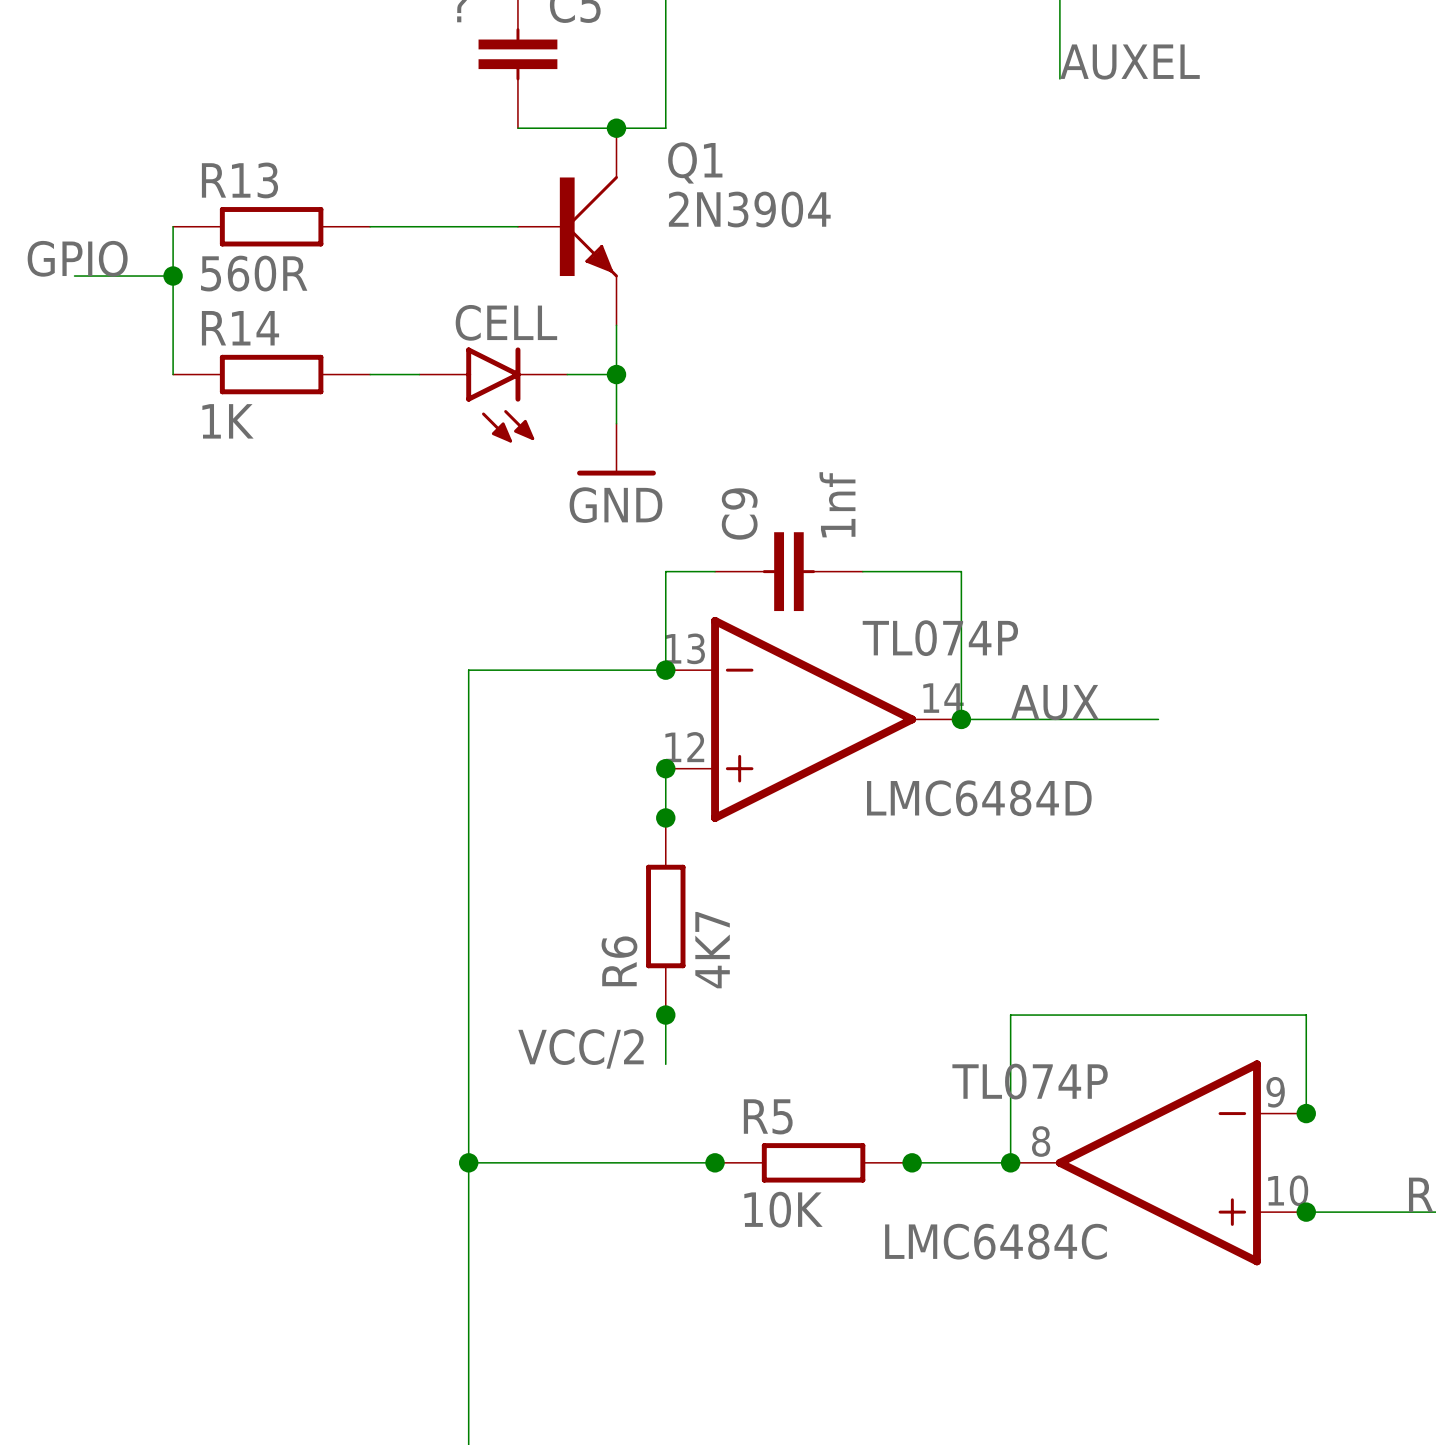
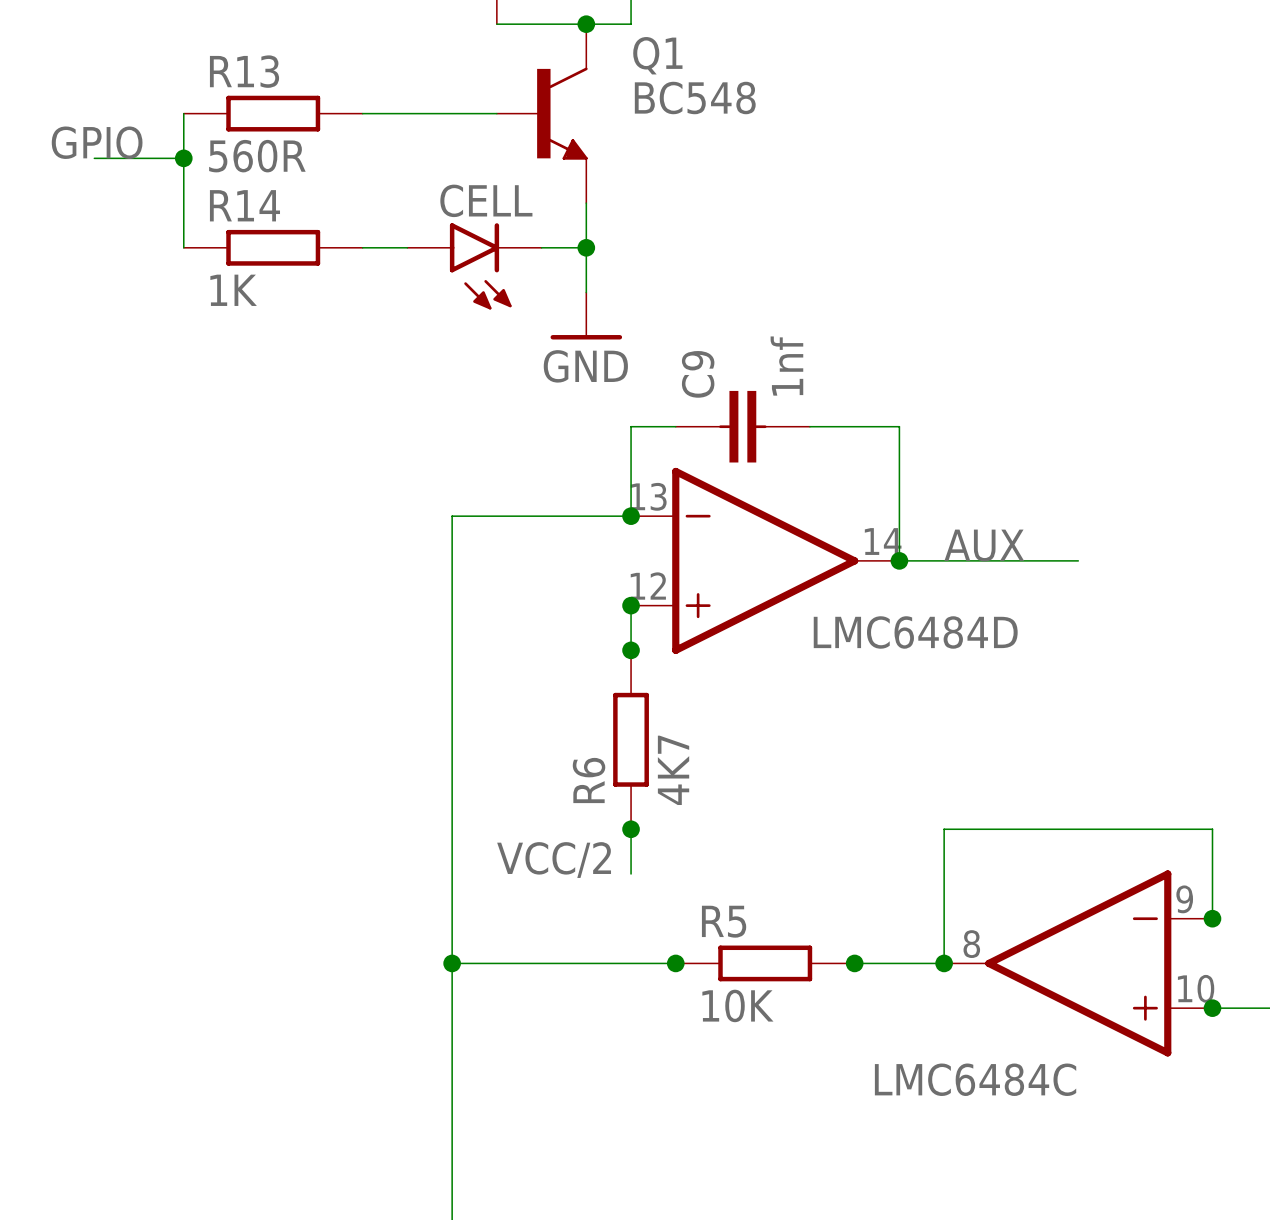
Q1 symbol: [517, 128, 618, 326] -> [496, 24, 588, 204]
Q1 value: 2N3904 (749, 209) -> BC548 (695, 97)
LMC6484D value: TL074P (940, 638) -> none
LMC6484C value: TL074P (1030, 1081) -> none
LMC6484C name position: LMC6484C (995, 1241) -> LMC6484C (975, 1079)

